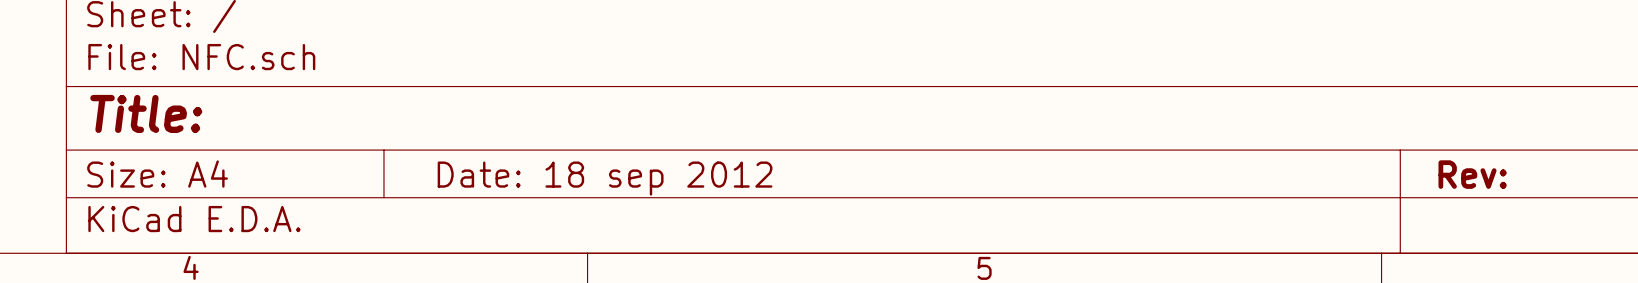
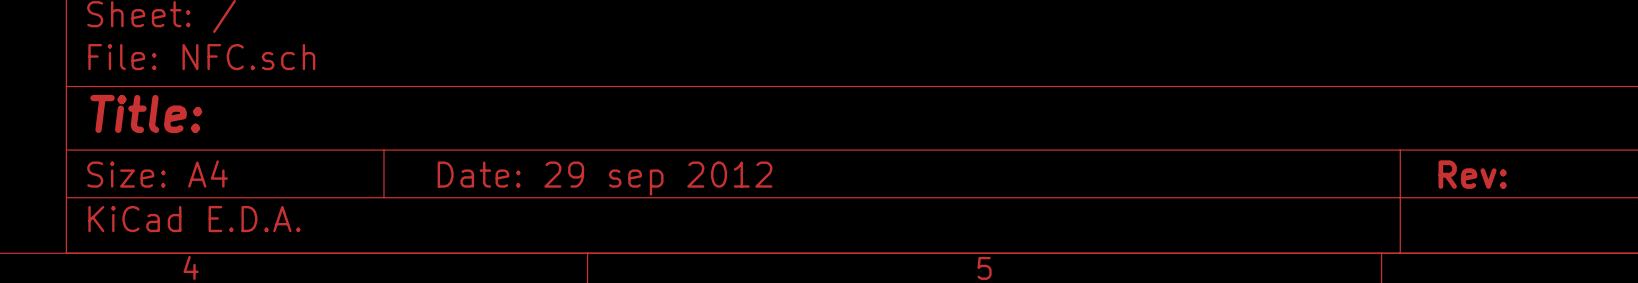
title block: Date: 18 sep 2012 (605, 178) -> Date: 29 sep 2012 (605, 178)

